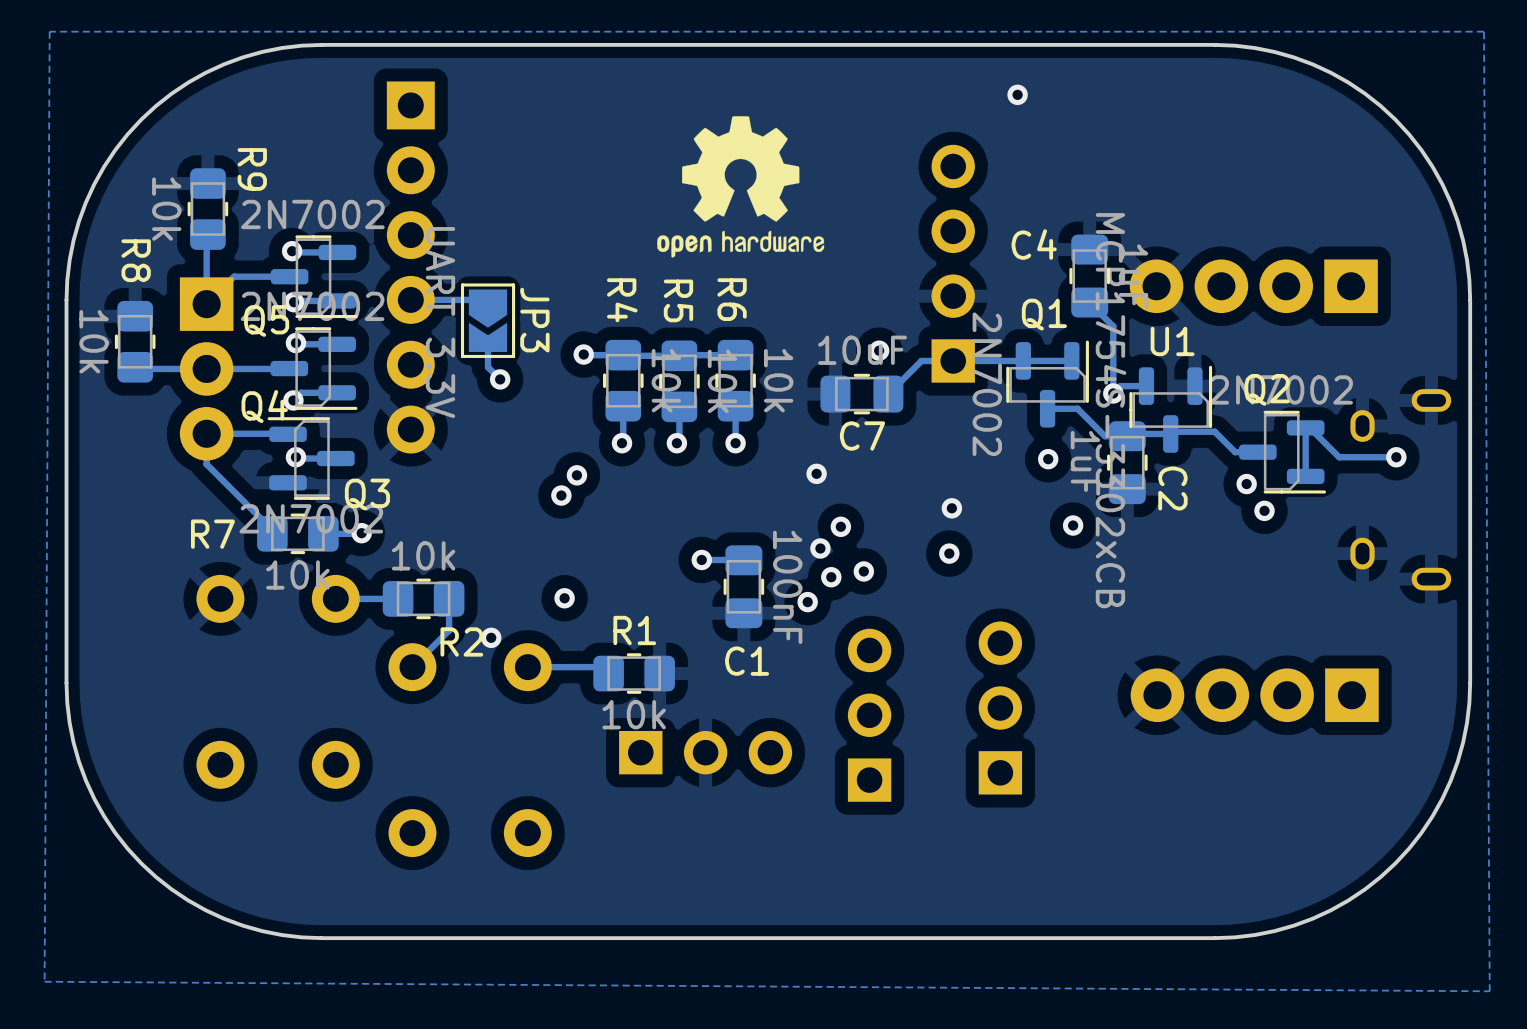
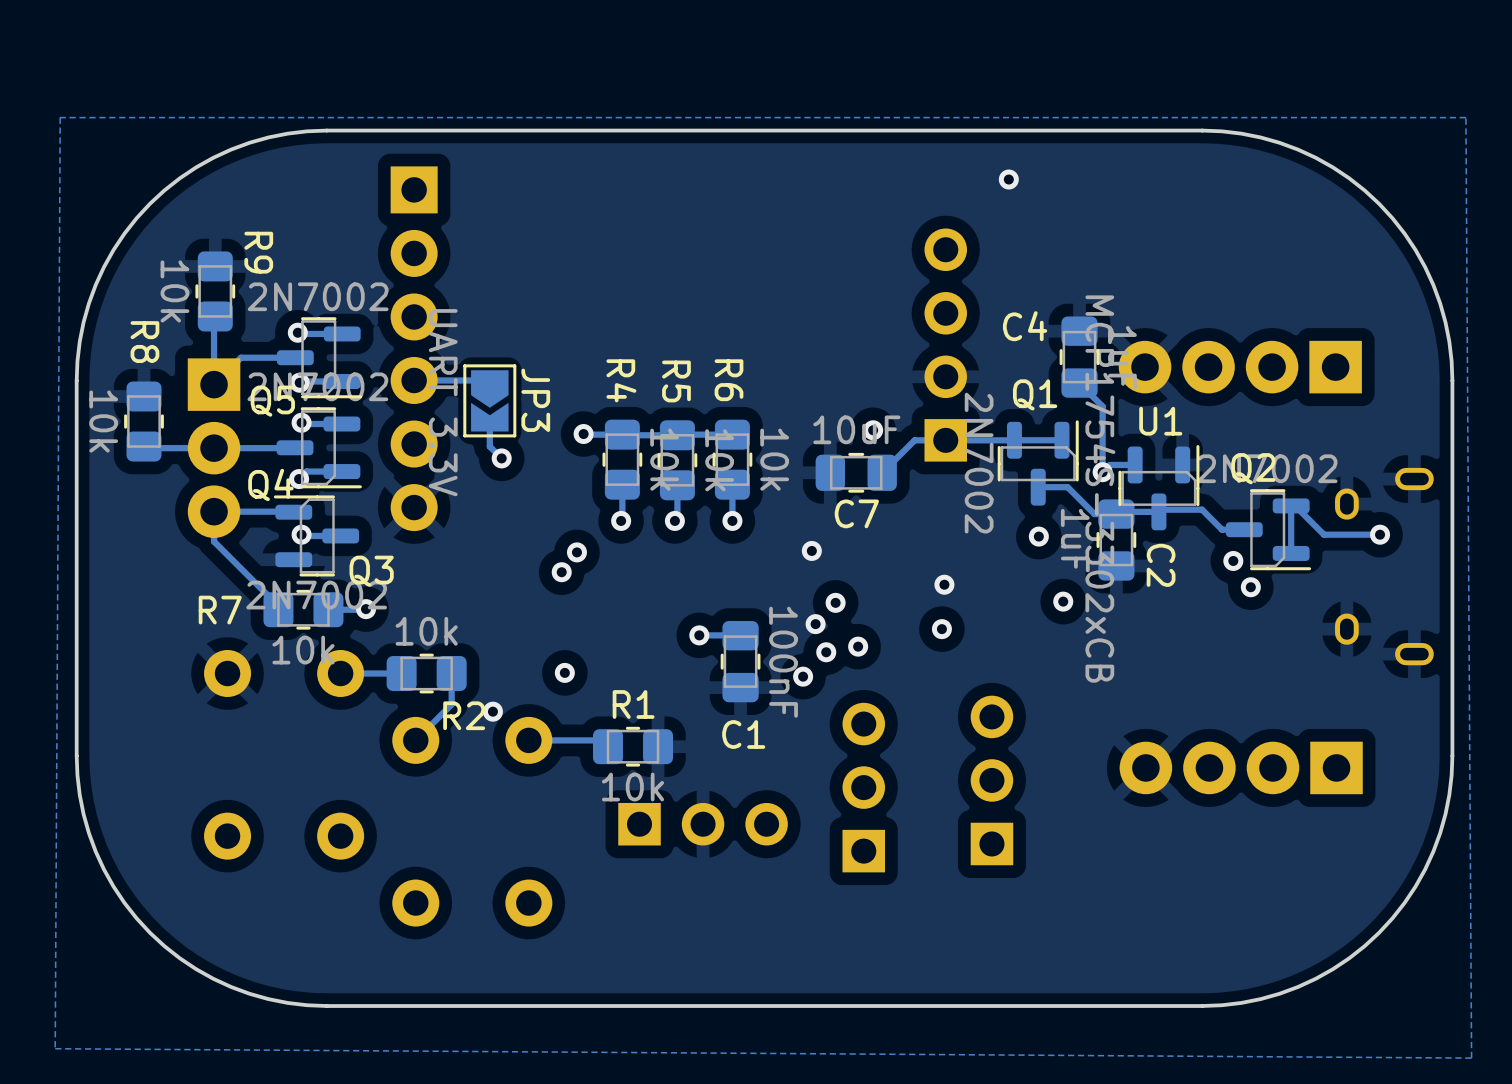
drawing: [657, 116, 825, 258] -> none

